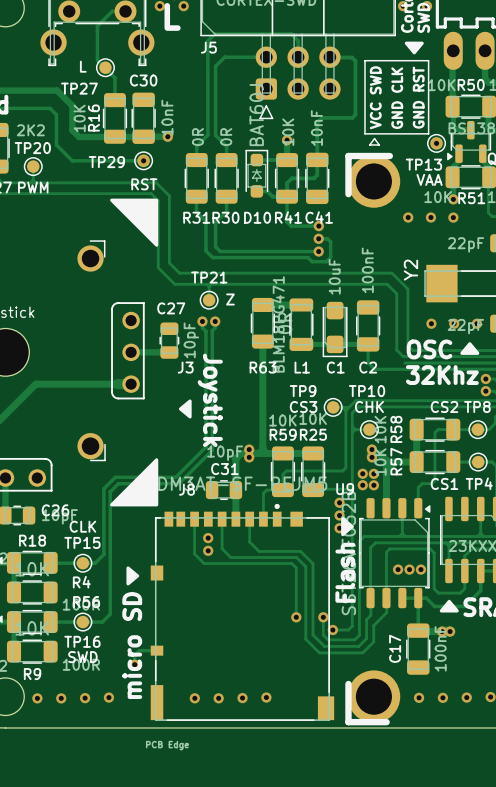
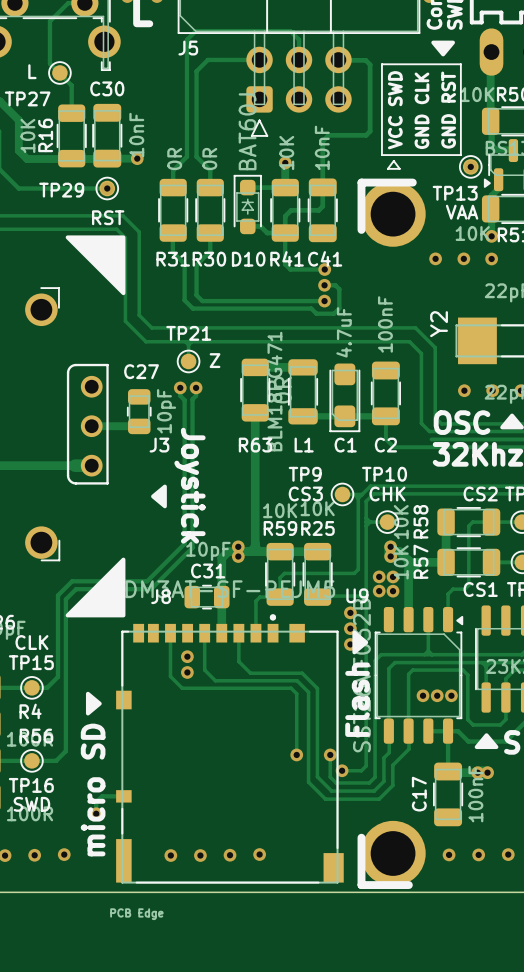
C1 value: 10uF (334, 276) -> 4.7uF (344, 332)

